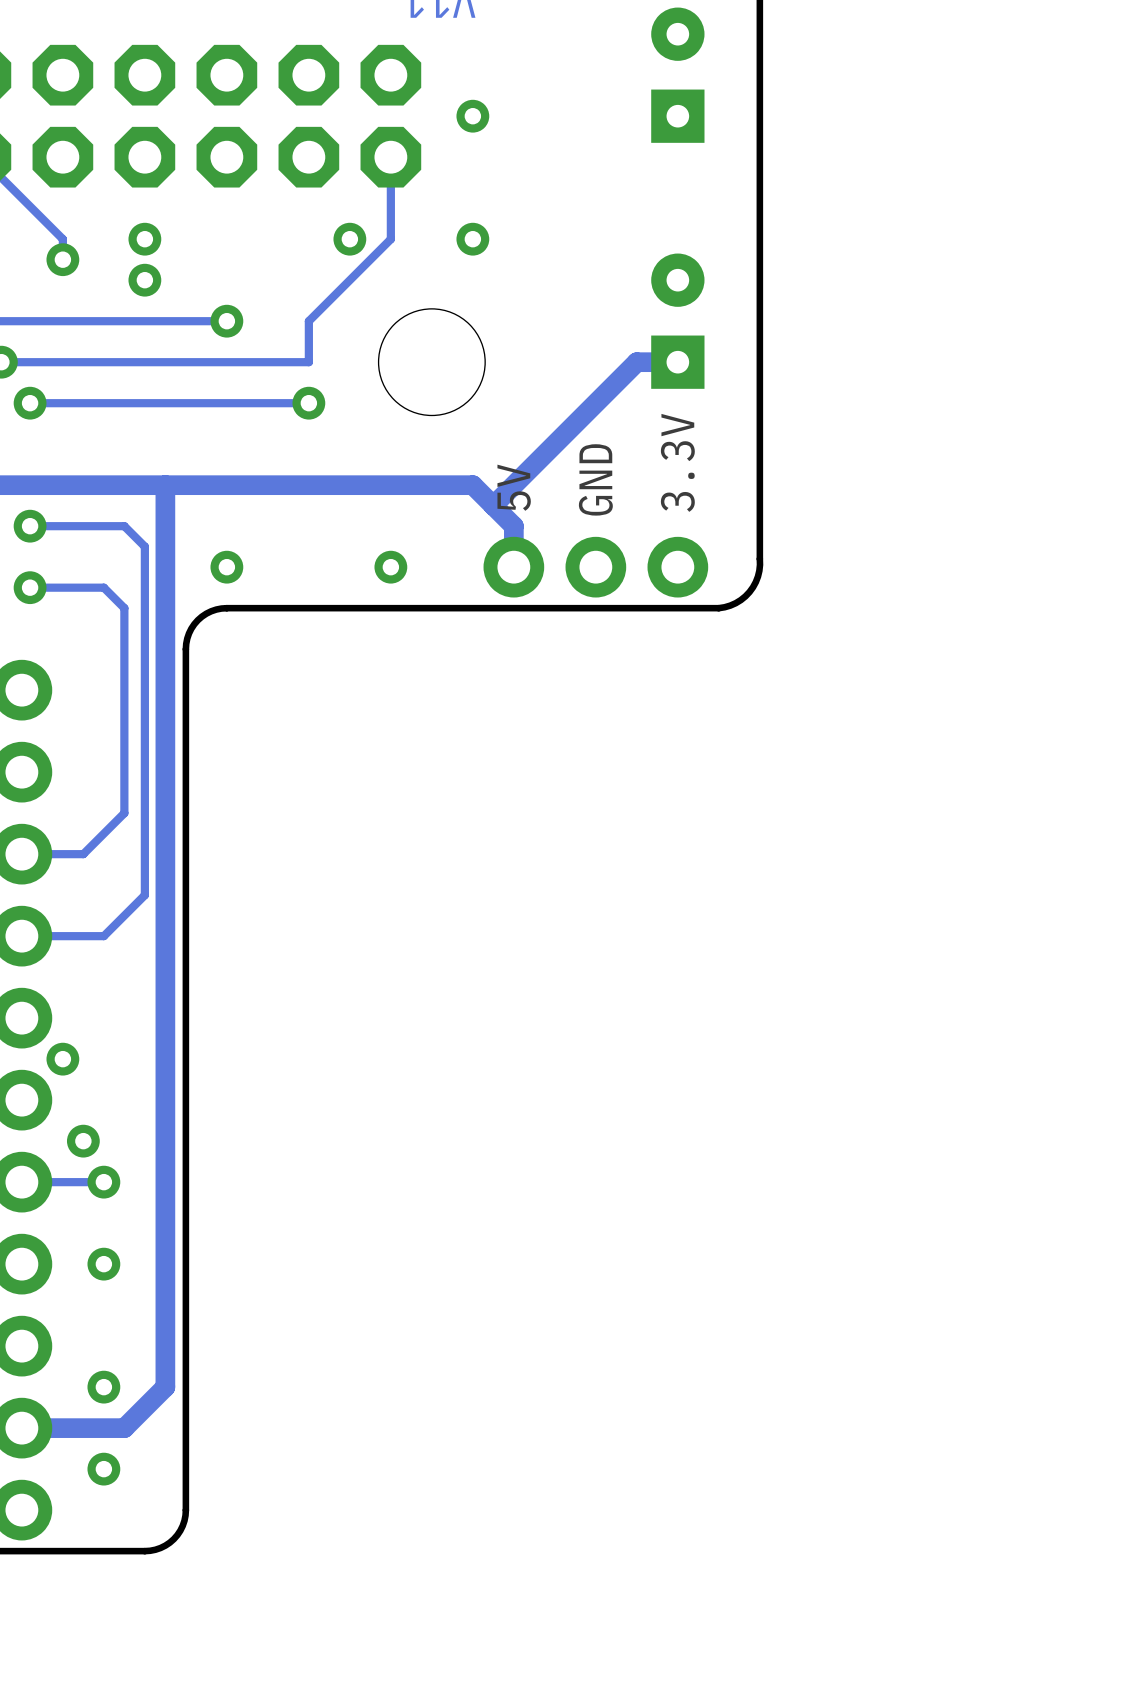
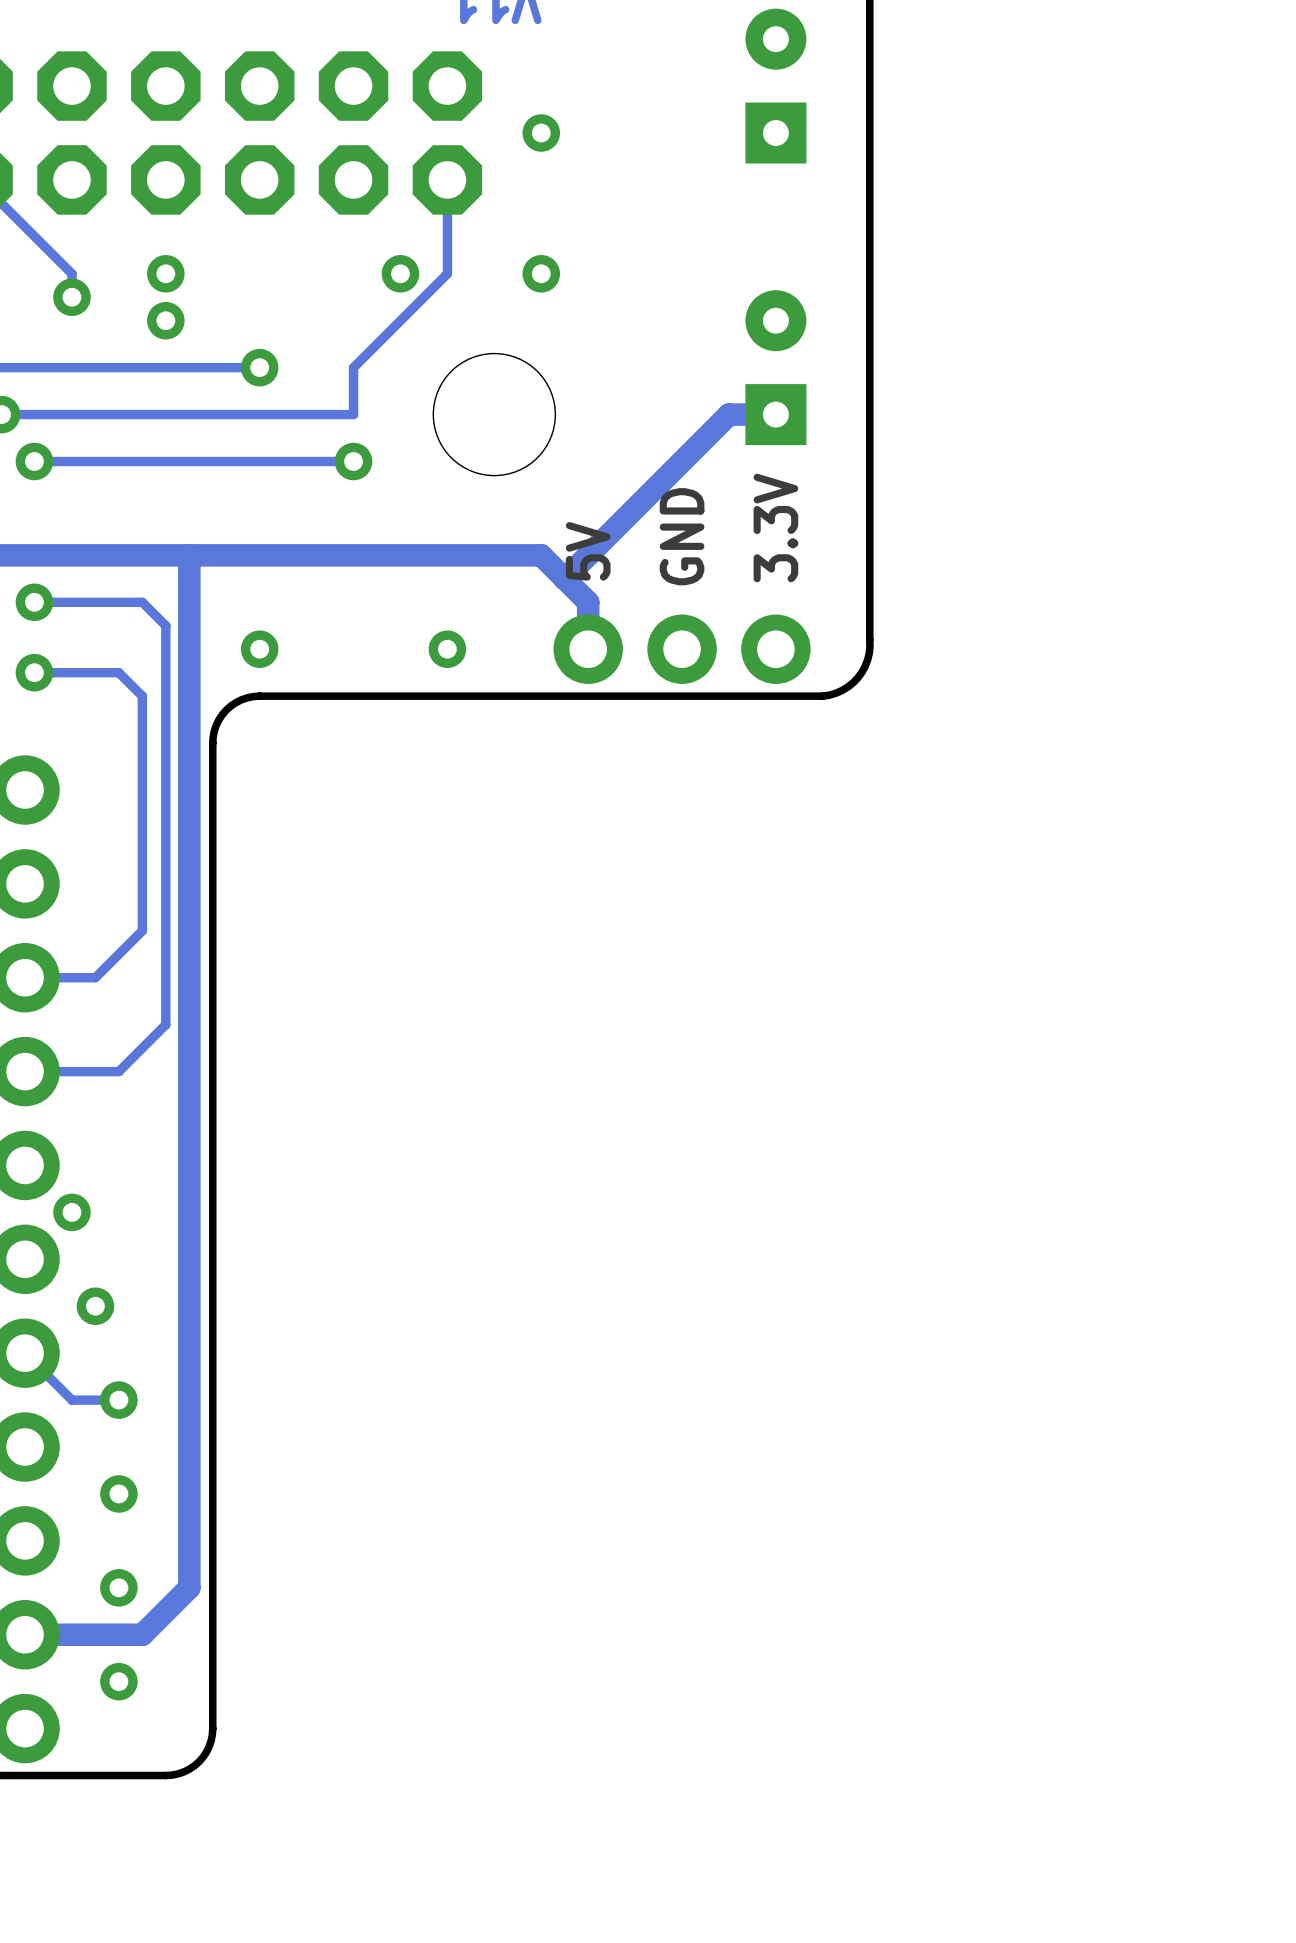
track: (103, 1182) (21, 1182) -> (118, 1400) (71, 1400) (25, 1353)
via: (103, 1182) -> none
via: none -> (118, 1400)
via: (103, 1264) -> none
via: none -> (118, 1493)

